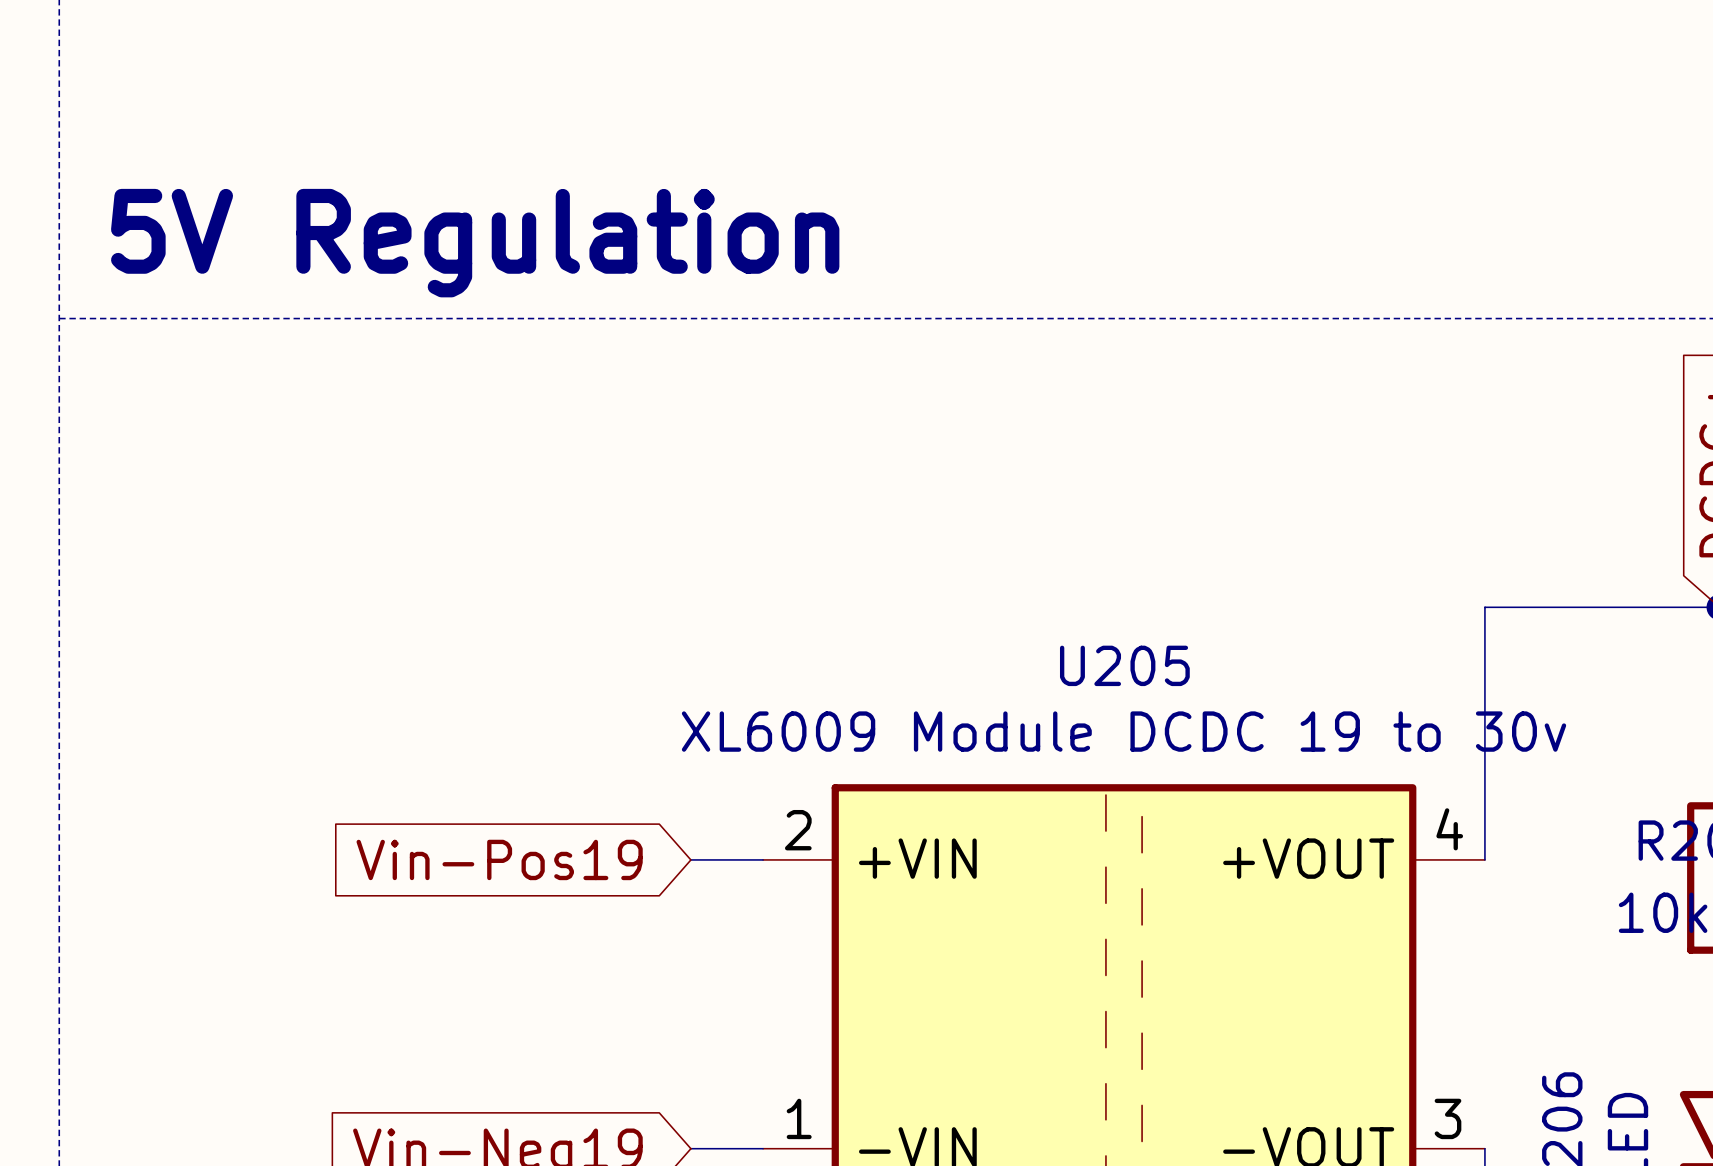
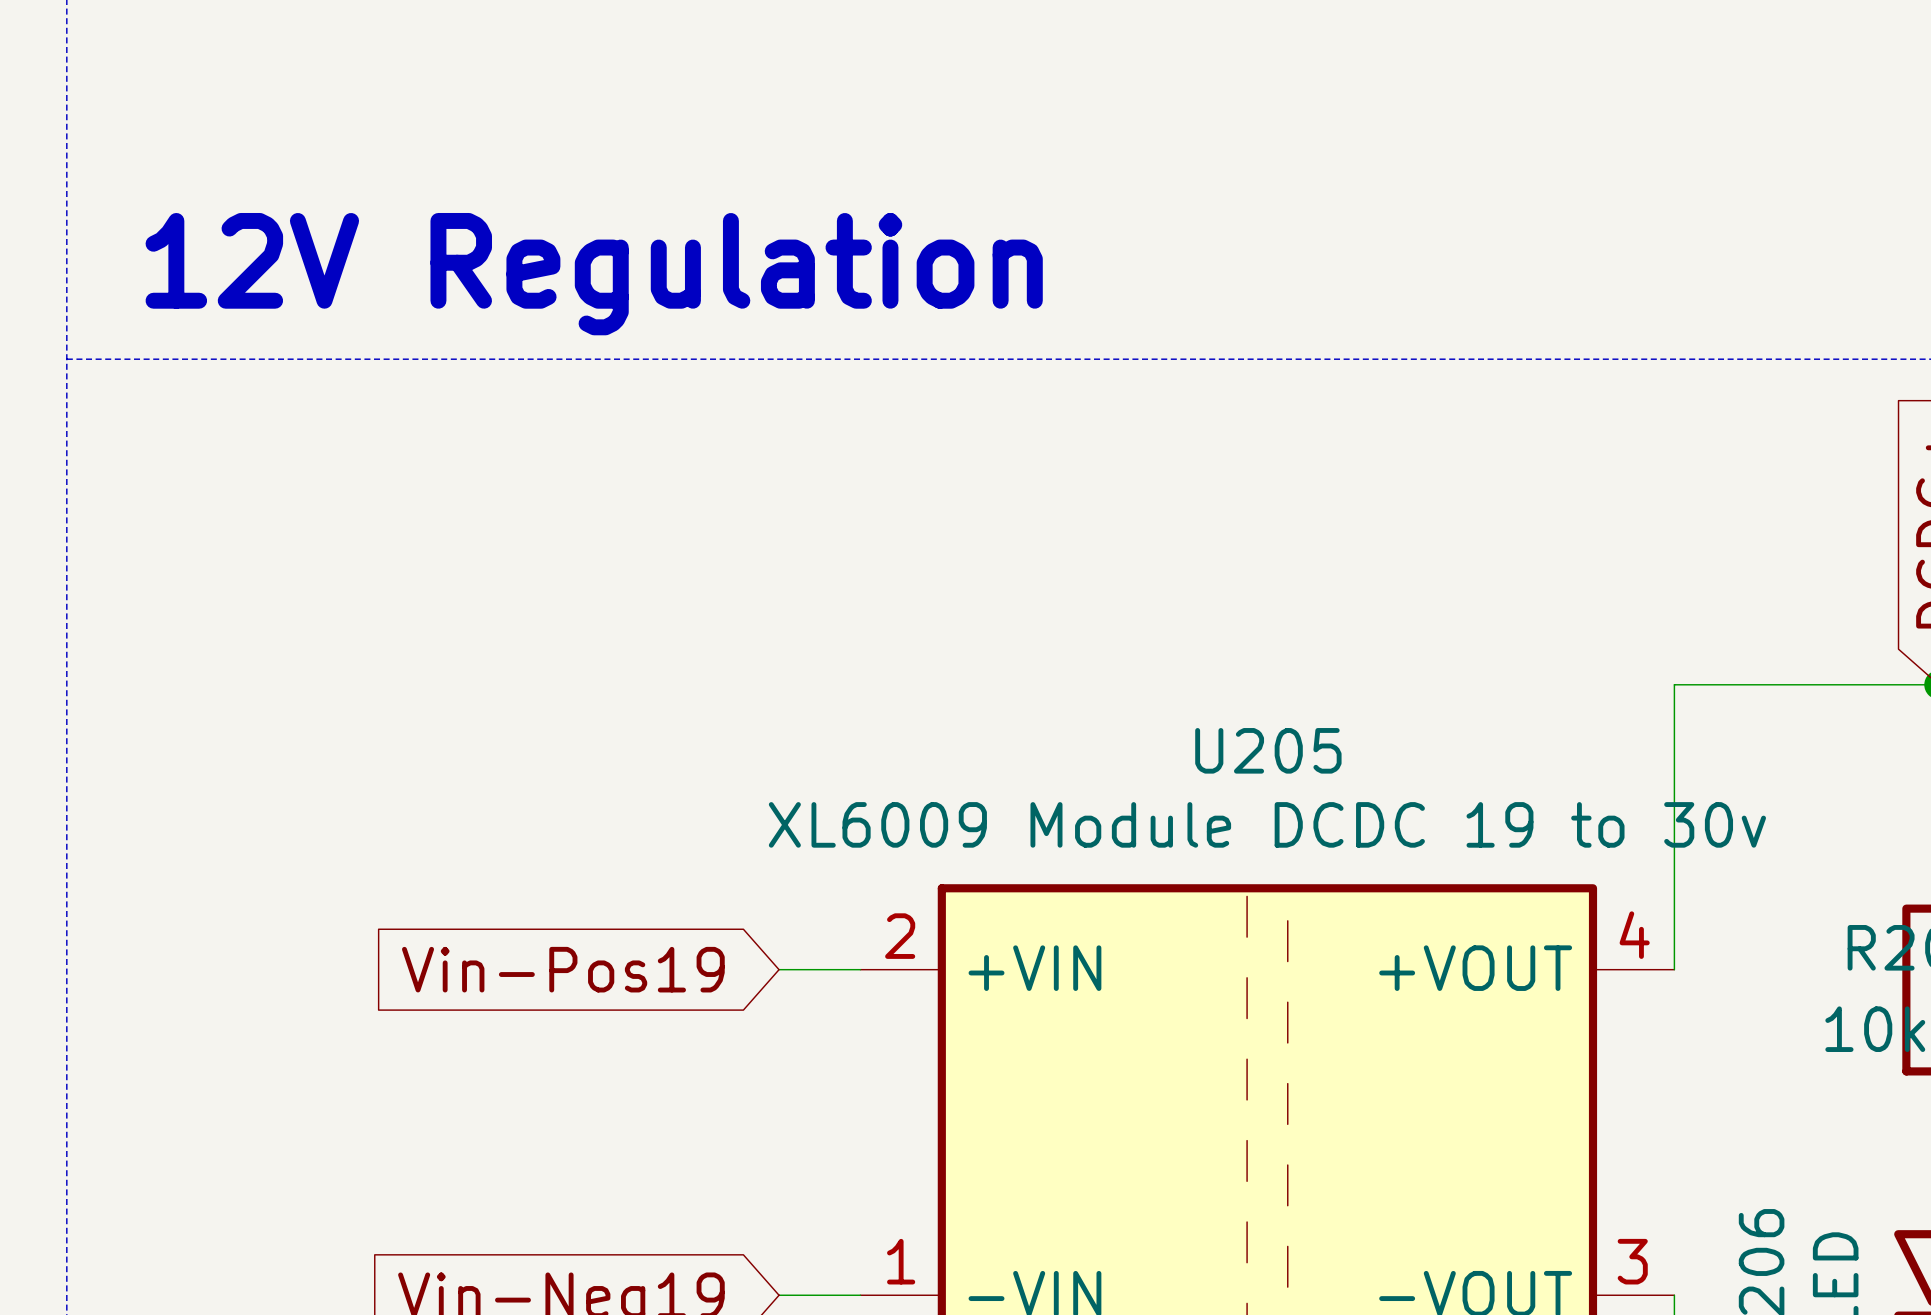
text: 5V Regulation (475, 243) -> 12V Regulation (594, 274)

